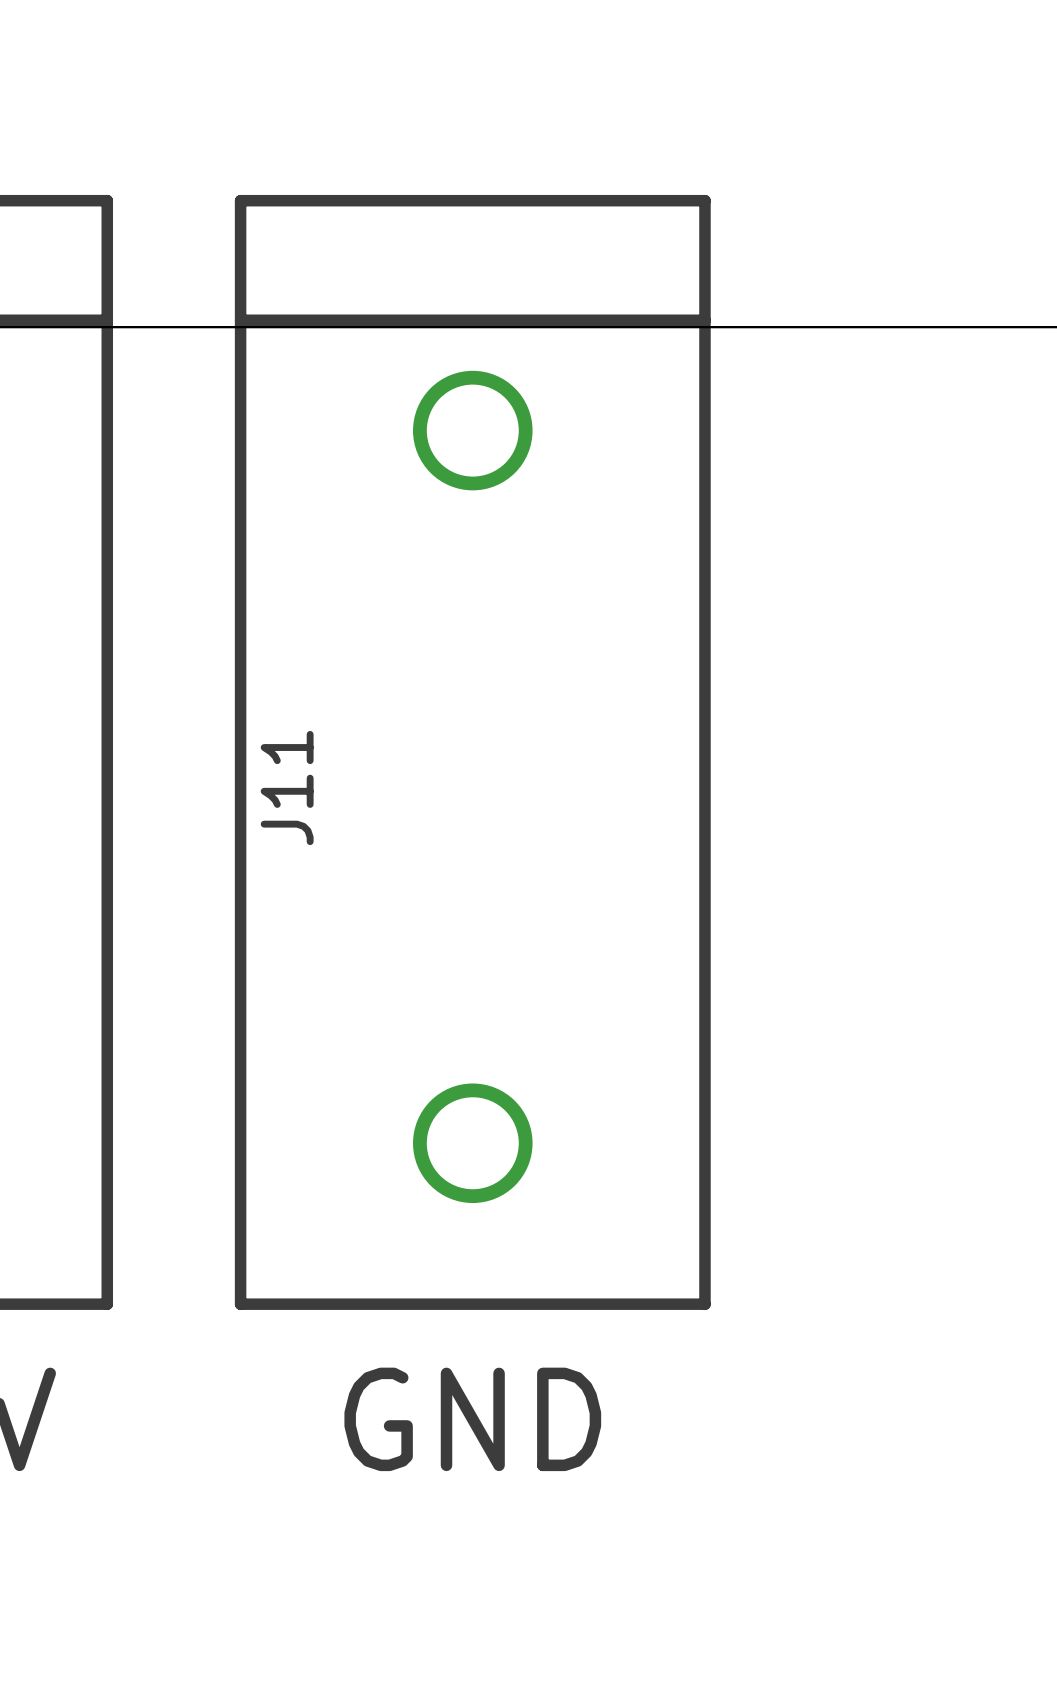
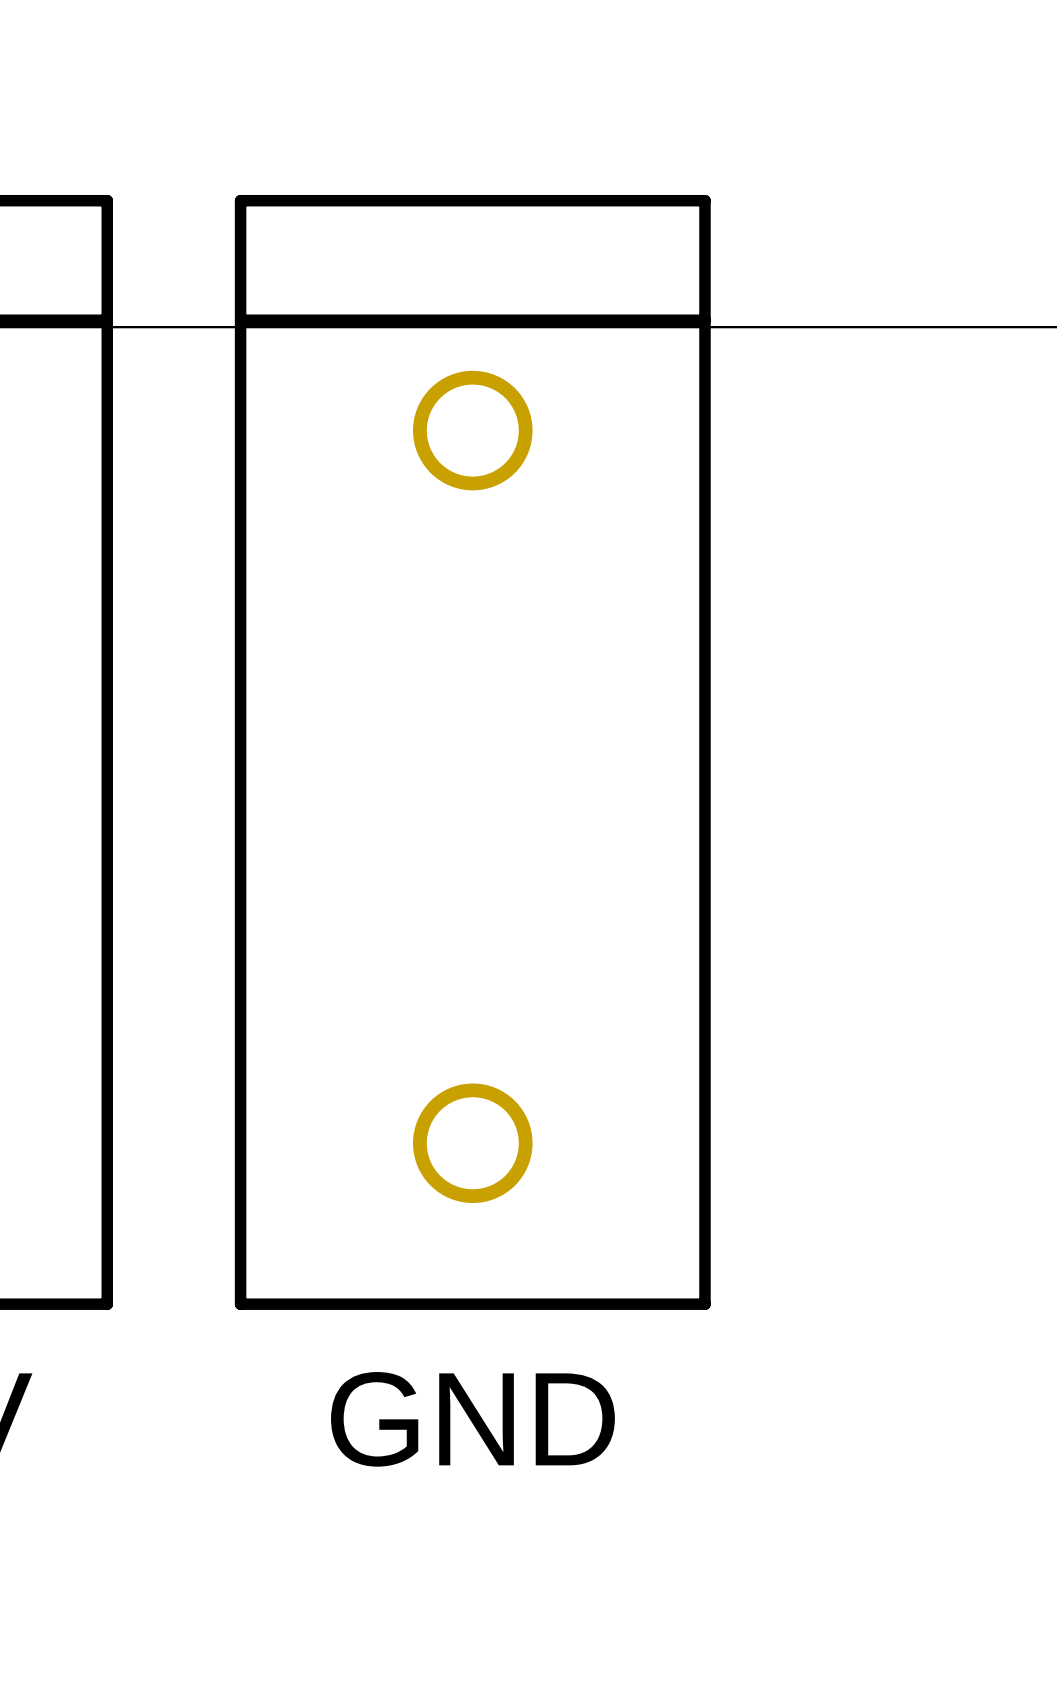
J11 name: J11 (287, 788) -> none

